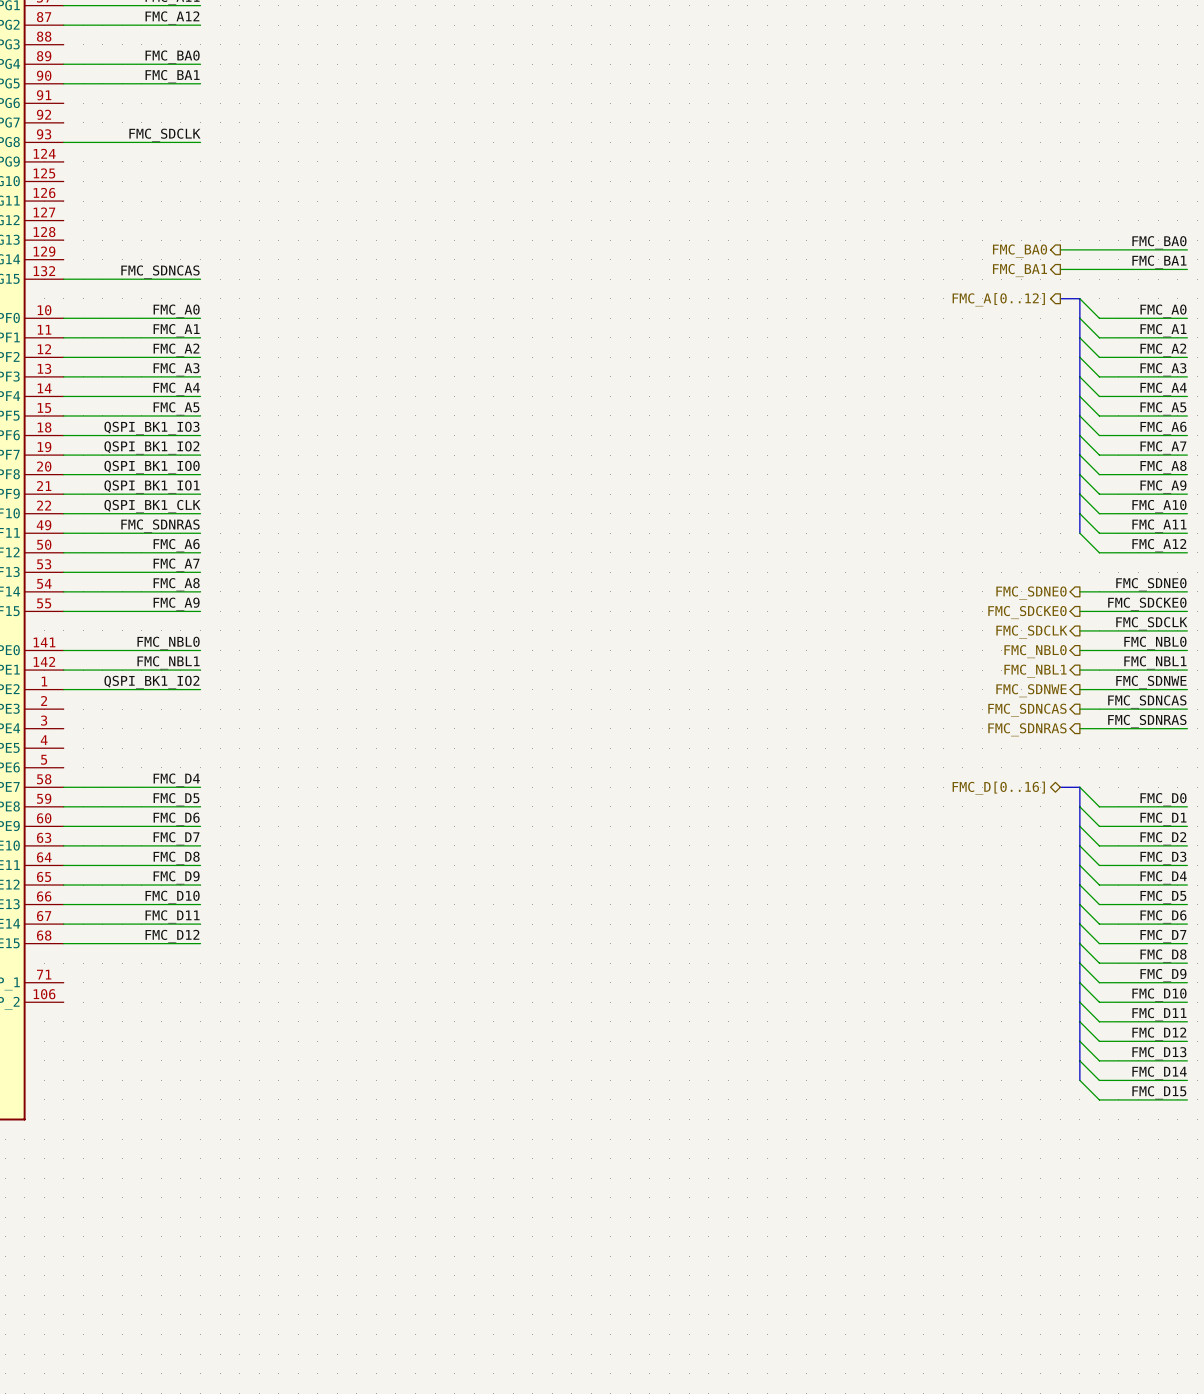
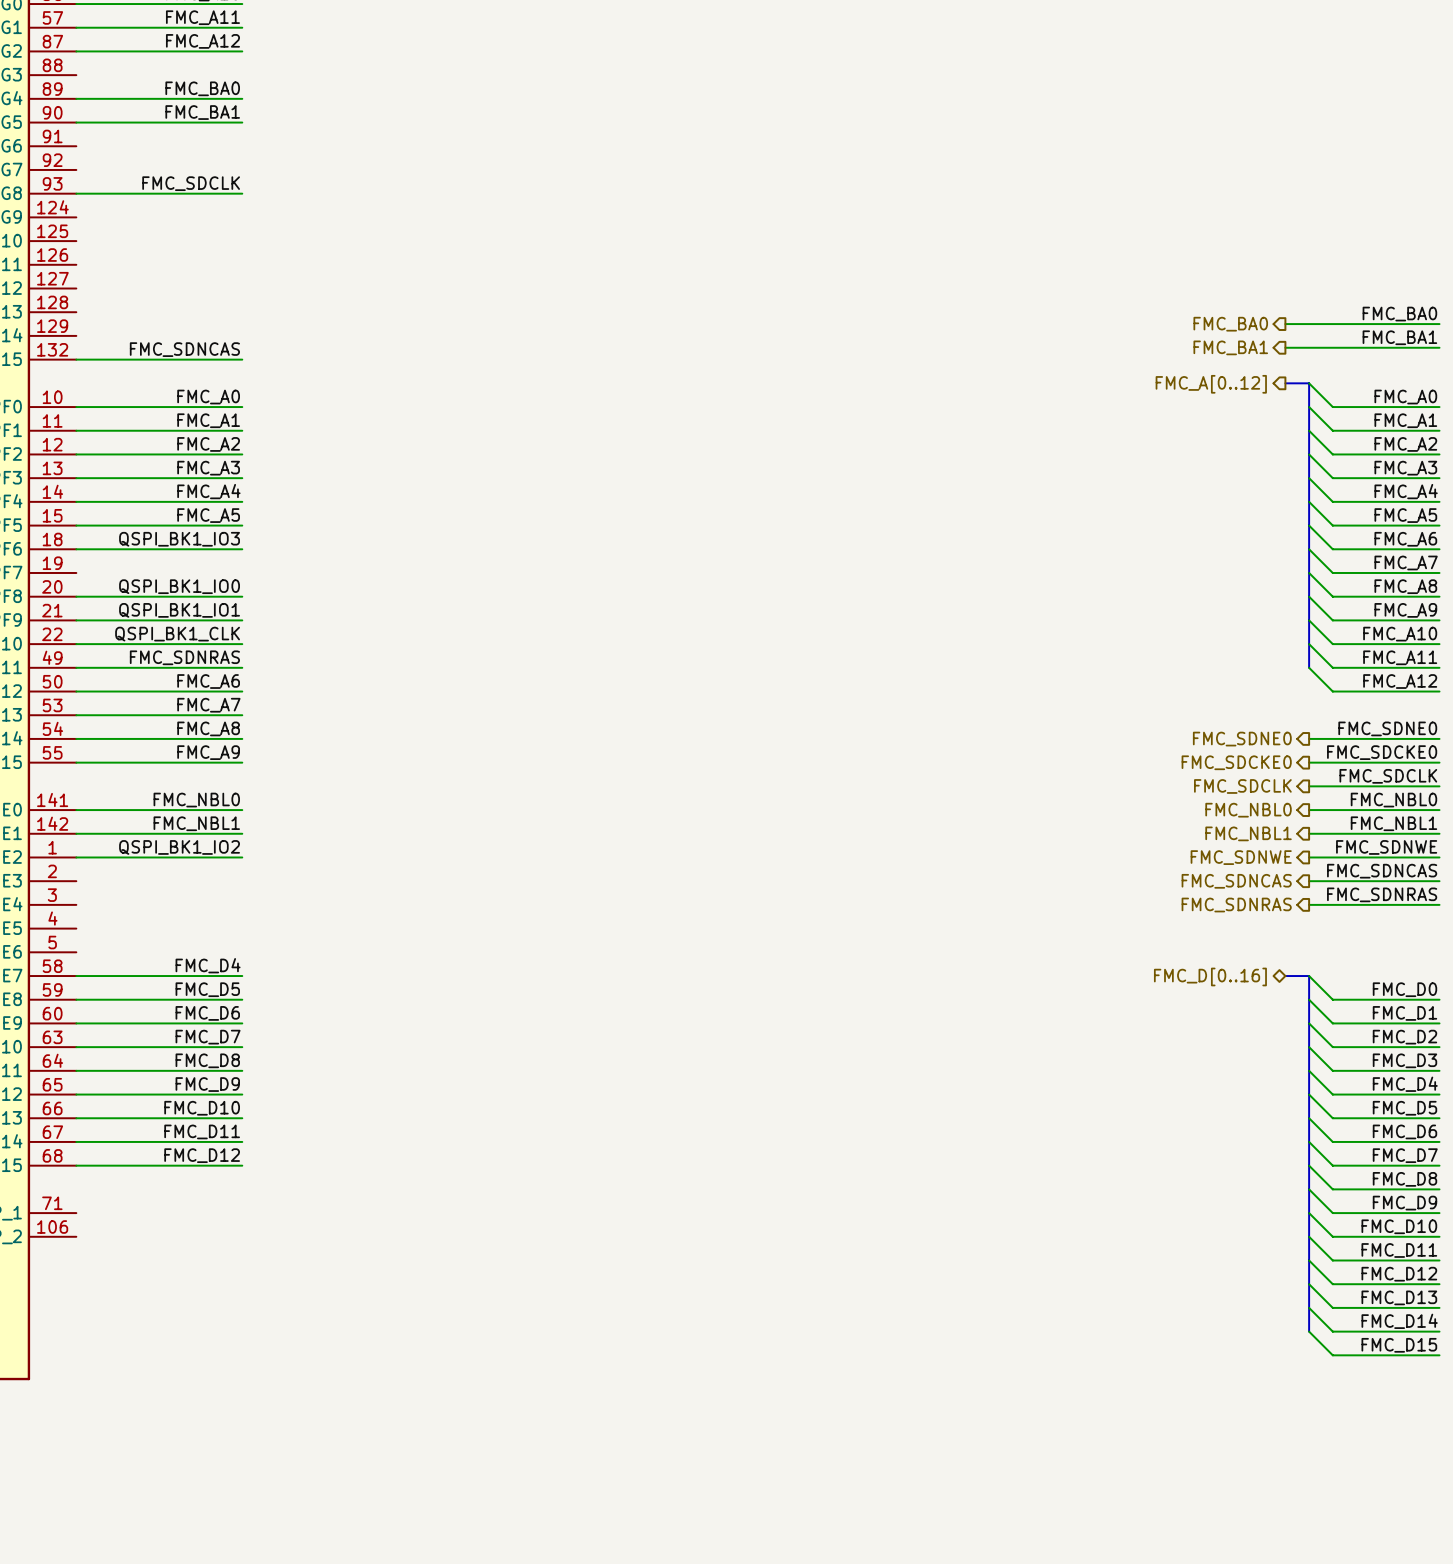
label: QSPI_BK1_IO2 (151, 447) -> none
wire: (63, 455) (200, 455) -> none

